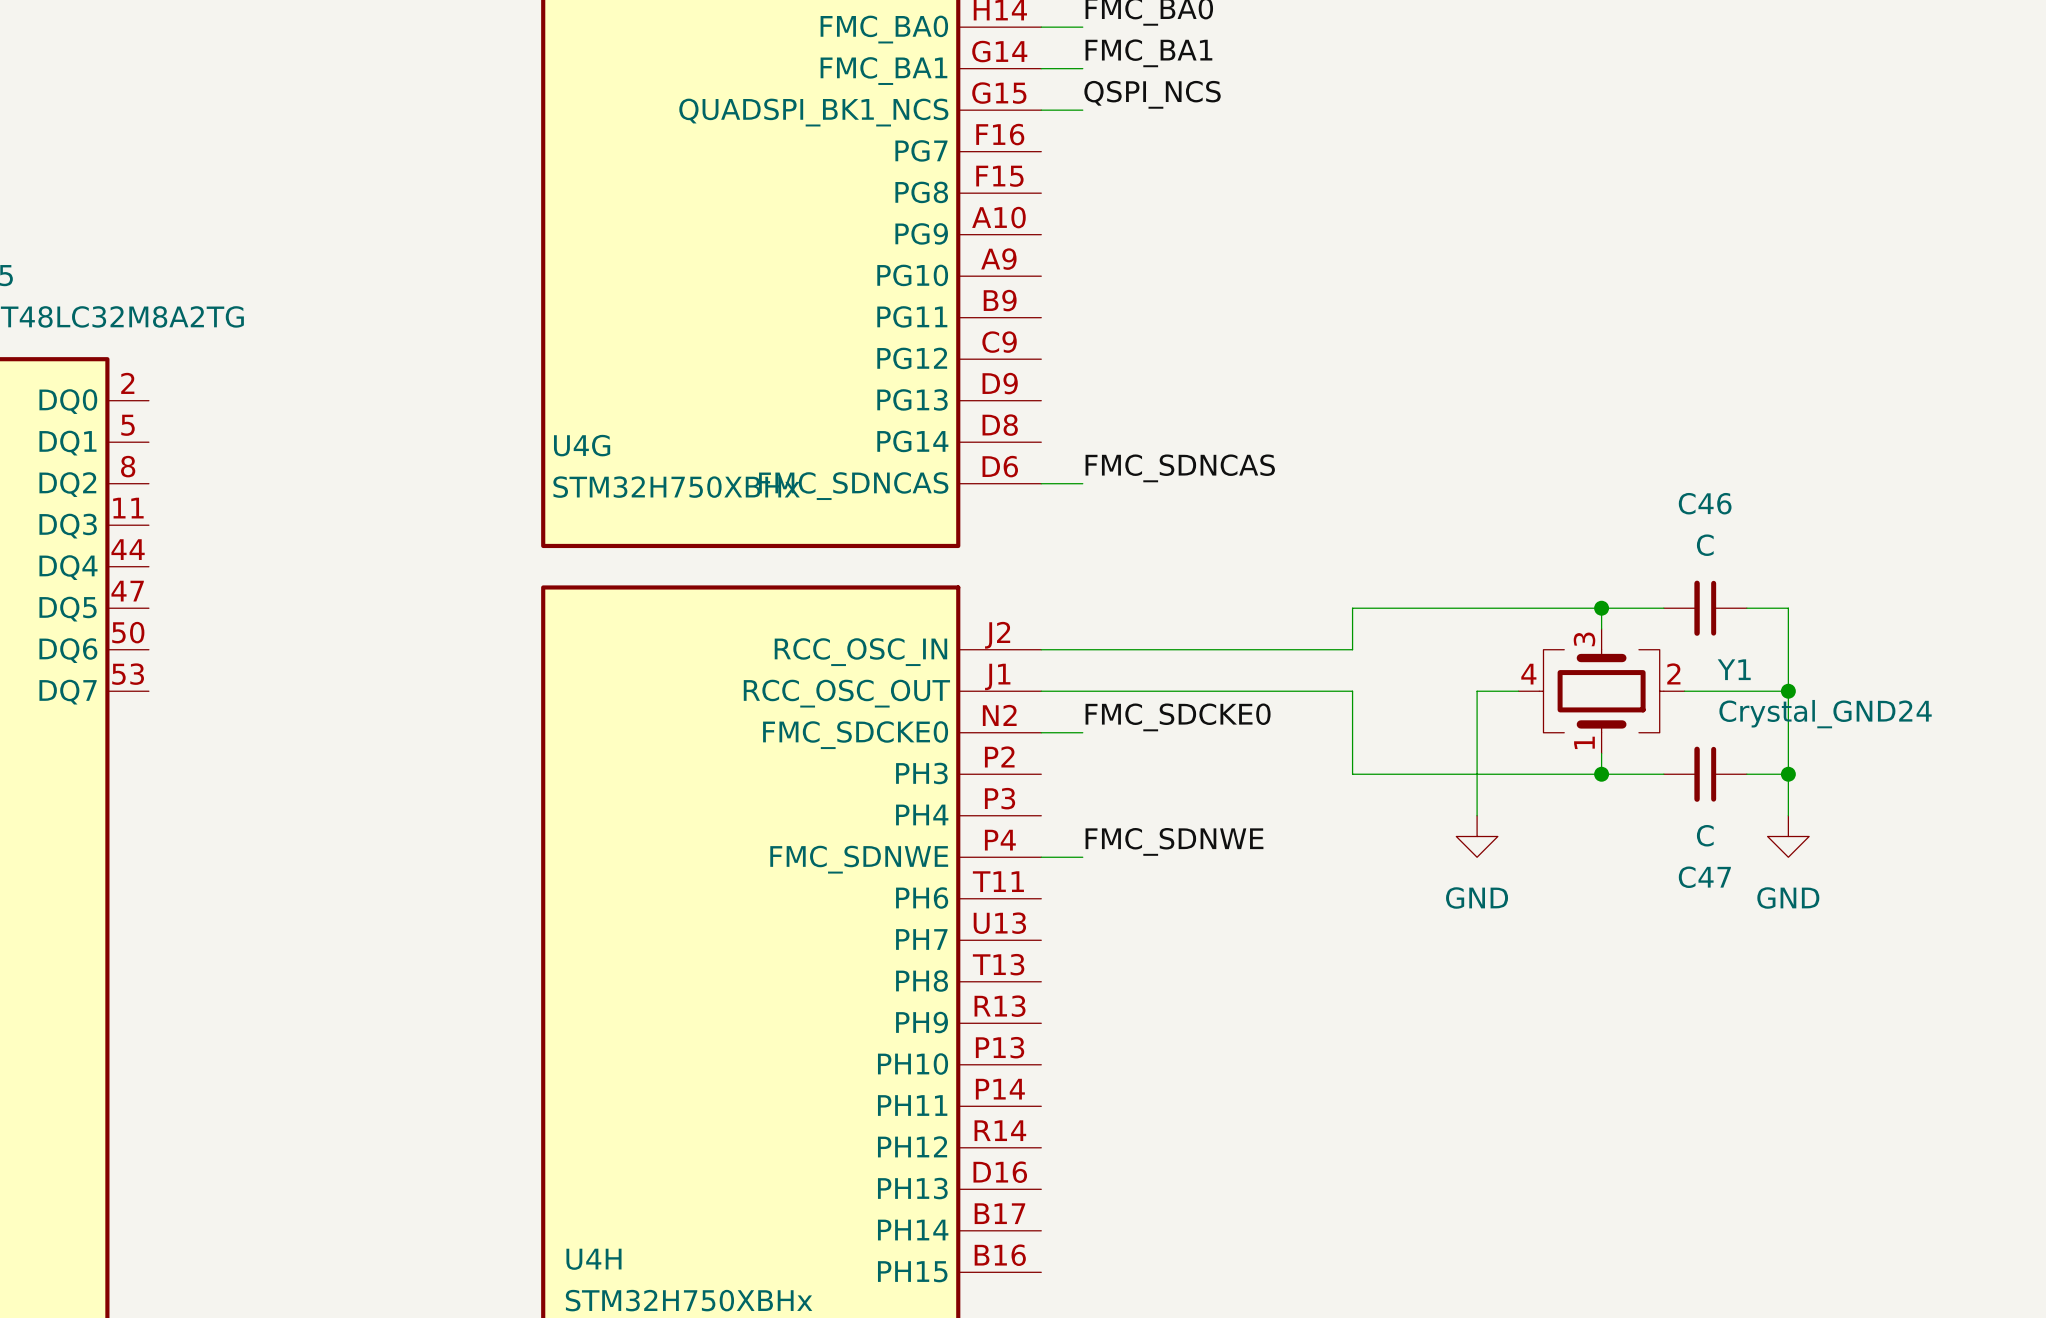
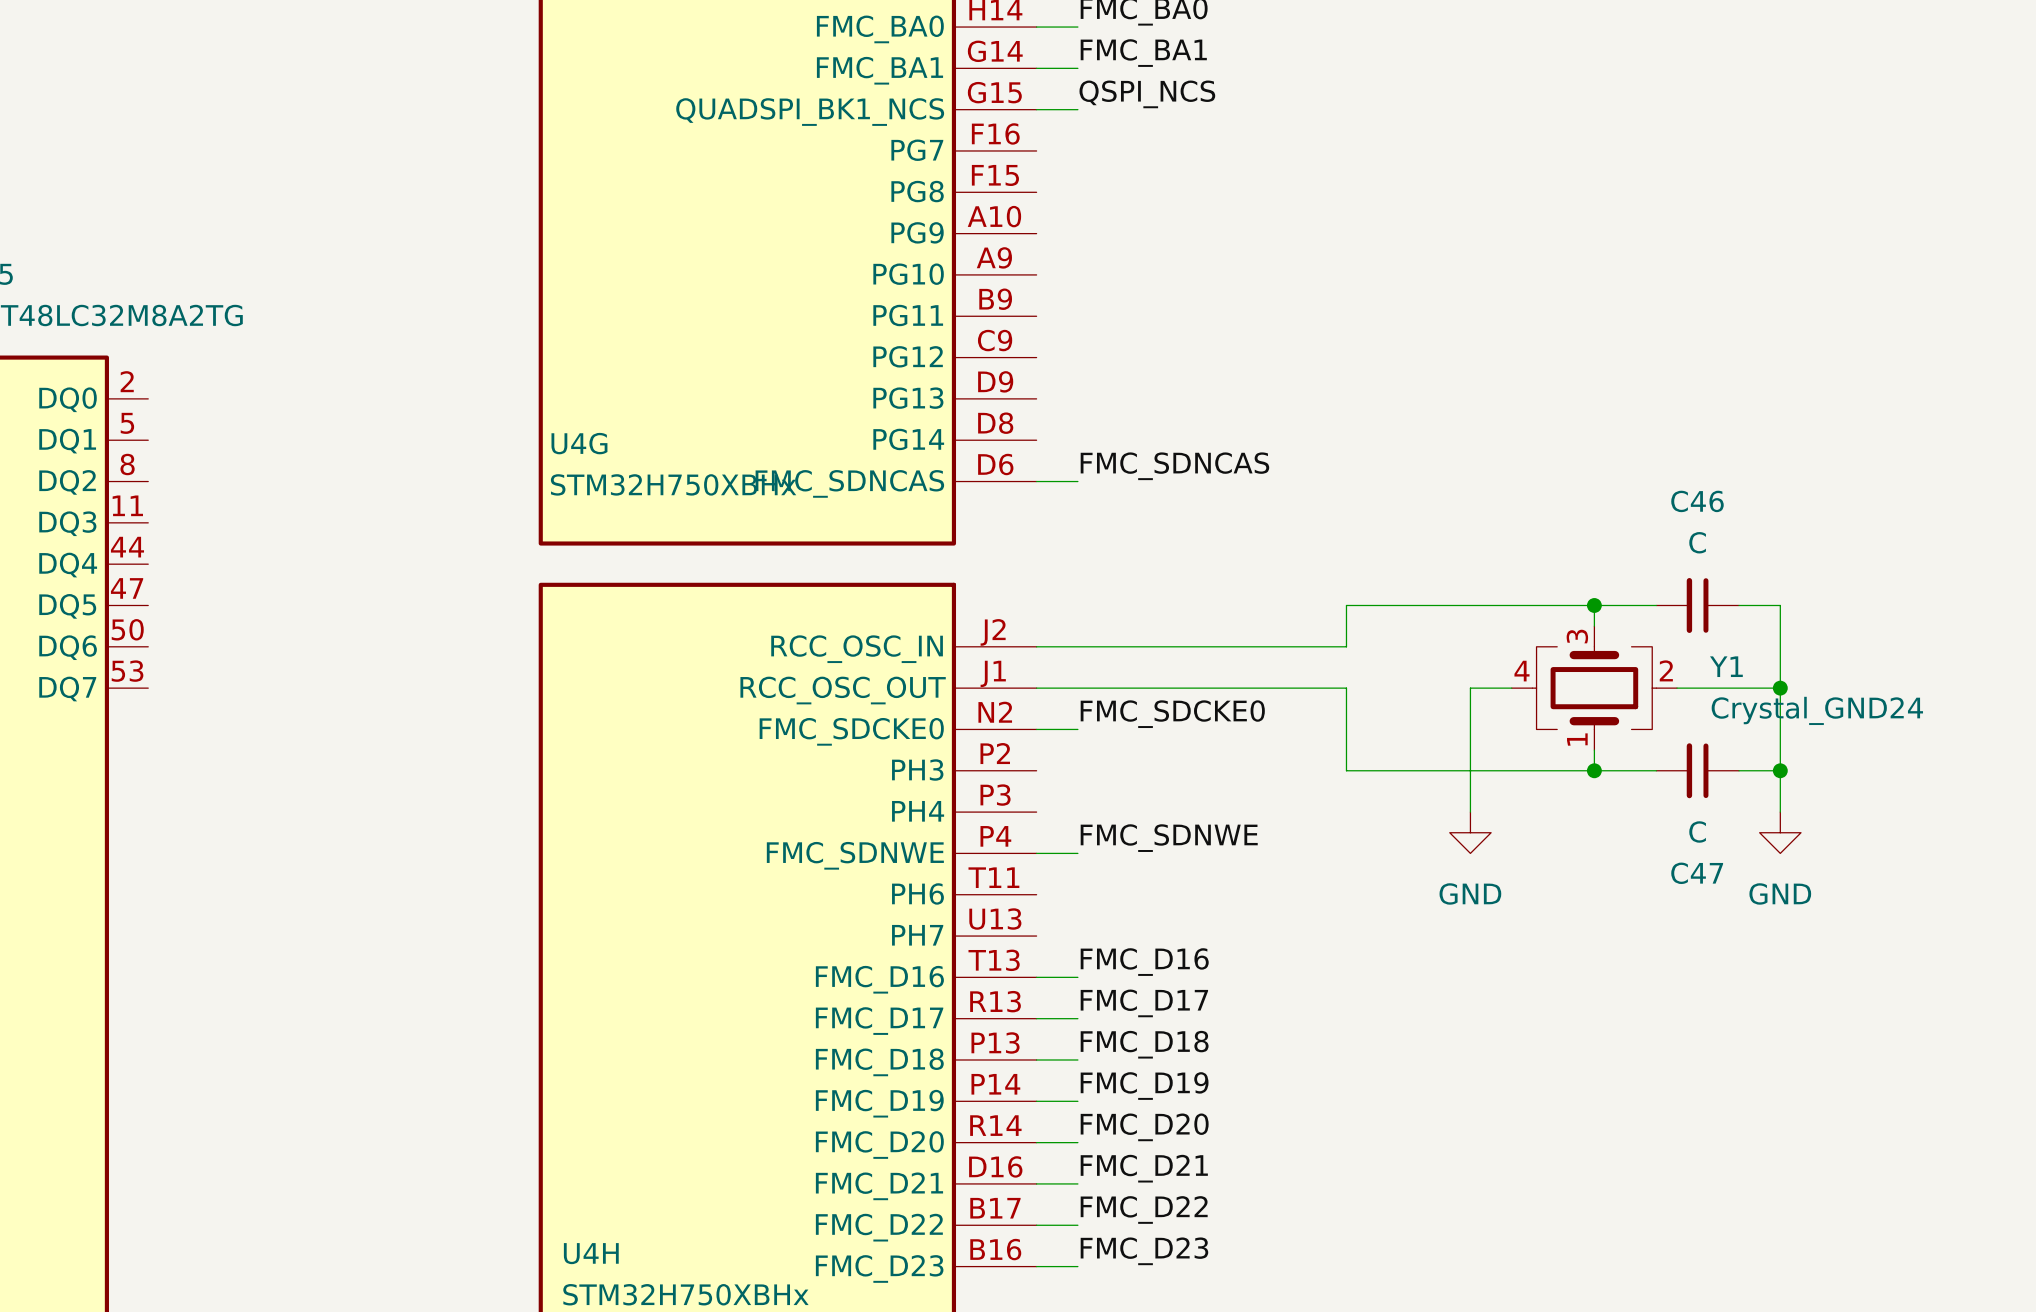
label: none -> FMC_D16 (1144, 962)
U4H pin name: PH8 (922, 981) -> FMC_D16 (879, 979)
wire: none -> (1036, 977) (1077, 977)
label: none -> FMC_D17 (1144, 1003)
U4H pin name: PH9 (922, 1022) -> FMC_D17 (879, 1021)
wire: none -> (1036, 1018) (1077, 1018)
label: none -> FMC_D18 (1144, 1044)
U4H pin name: PH10 (913, 1064) -> FMC_D18 (879, 1062)
wire: none -> (1036, 1059) (1077, 1059)
label: none -> FMC_D19 (1144, 1086)
U4H pin name: PH11 (912, 1105) -> FMC_D19 (879, 1103)
wire: none -> (1036, 1101) (1077, 1101)
label: none -> FMC_D20 (1144, 1127)
U4H pin name: PH12 (912, 1146) -> FMC_D20 (879, 1145)
wire: none -> (1036, 1142) (1077, 1142)
label: none -> FMC_D21 (1144, 1168)
U4H pin name: PH13 (912, 1188) -> FMC_D21 (879, 1186)
wire: none -> (1036, 1183) (1077, 1183)
label: none -> FMC_D22 (1144, 1209)
U4H pin name: PH14 (913, 1230) -> FMC_D22 (879, 1227)
wire: none -> (1036, 1225) (1077, 1225)
label: none -> FMC_D23 (1144, 1251)
U4H pin name: PH15 (912, 1271) -> FMC_D23 (879, 1268)
wire: none -> (1036, 1266) (1077, 1266)

